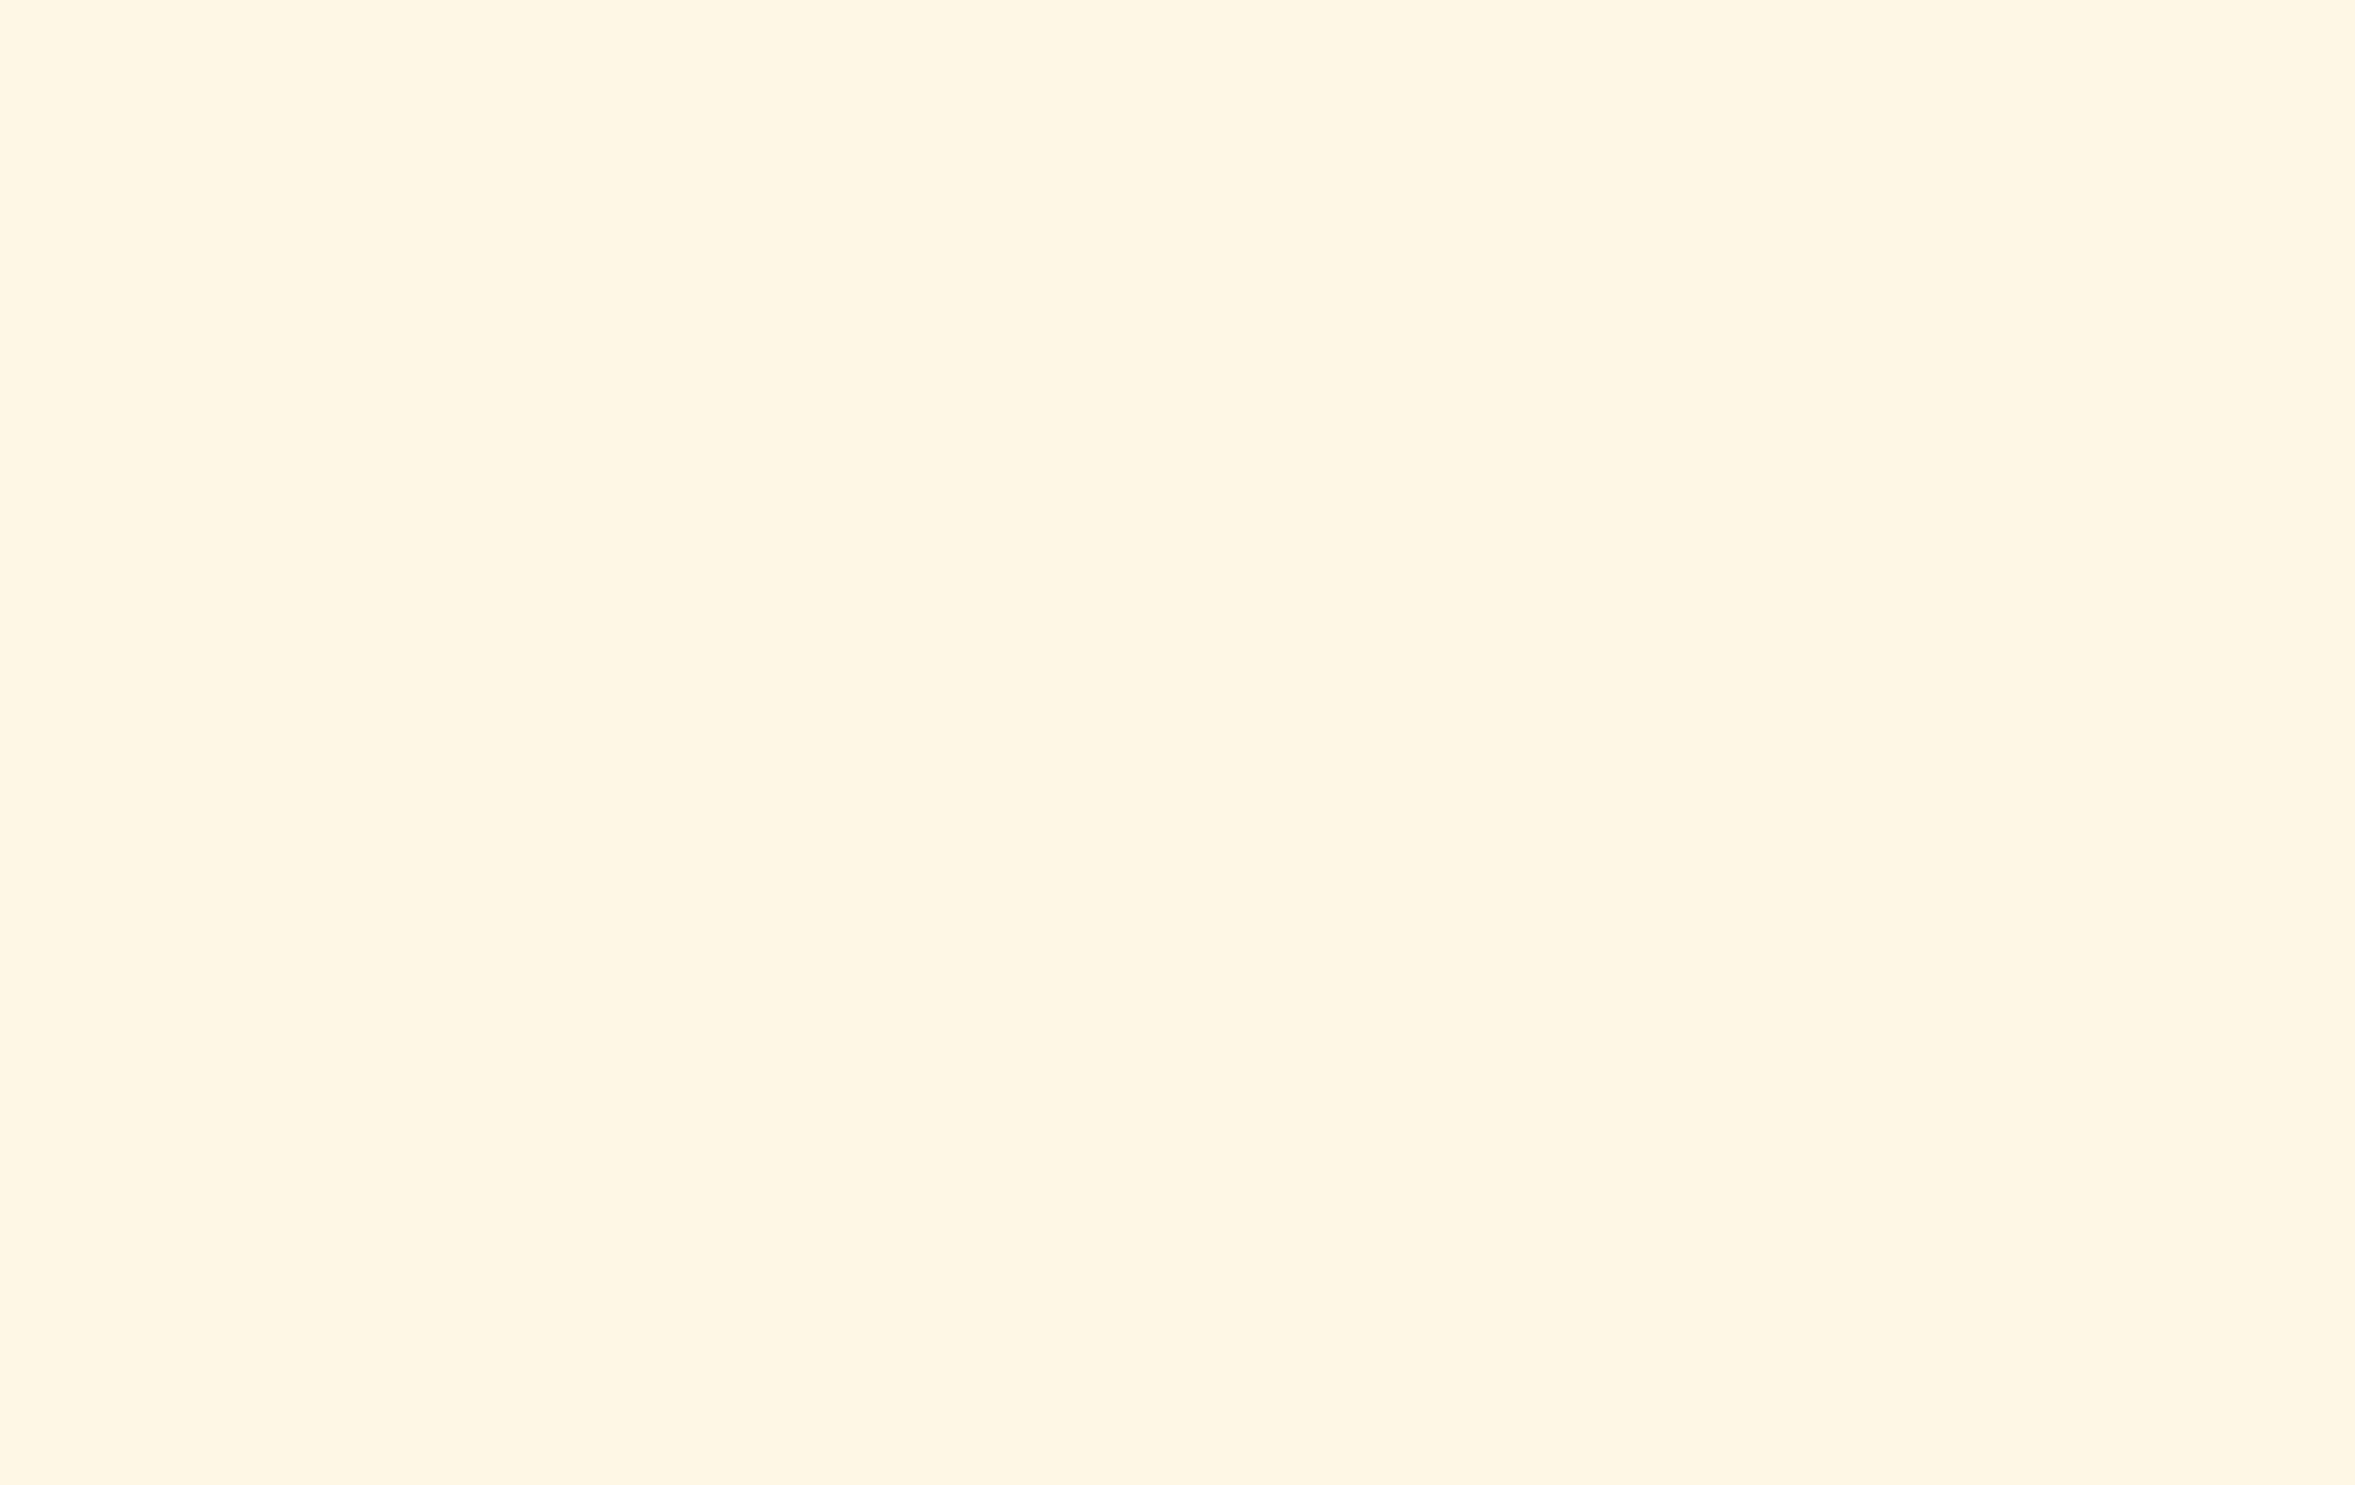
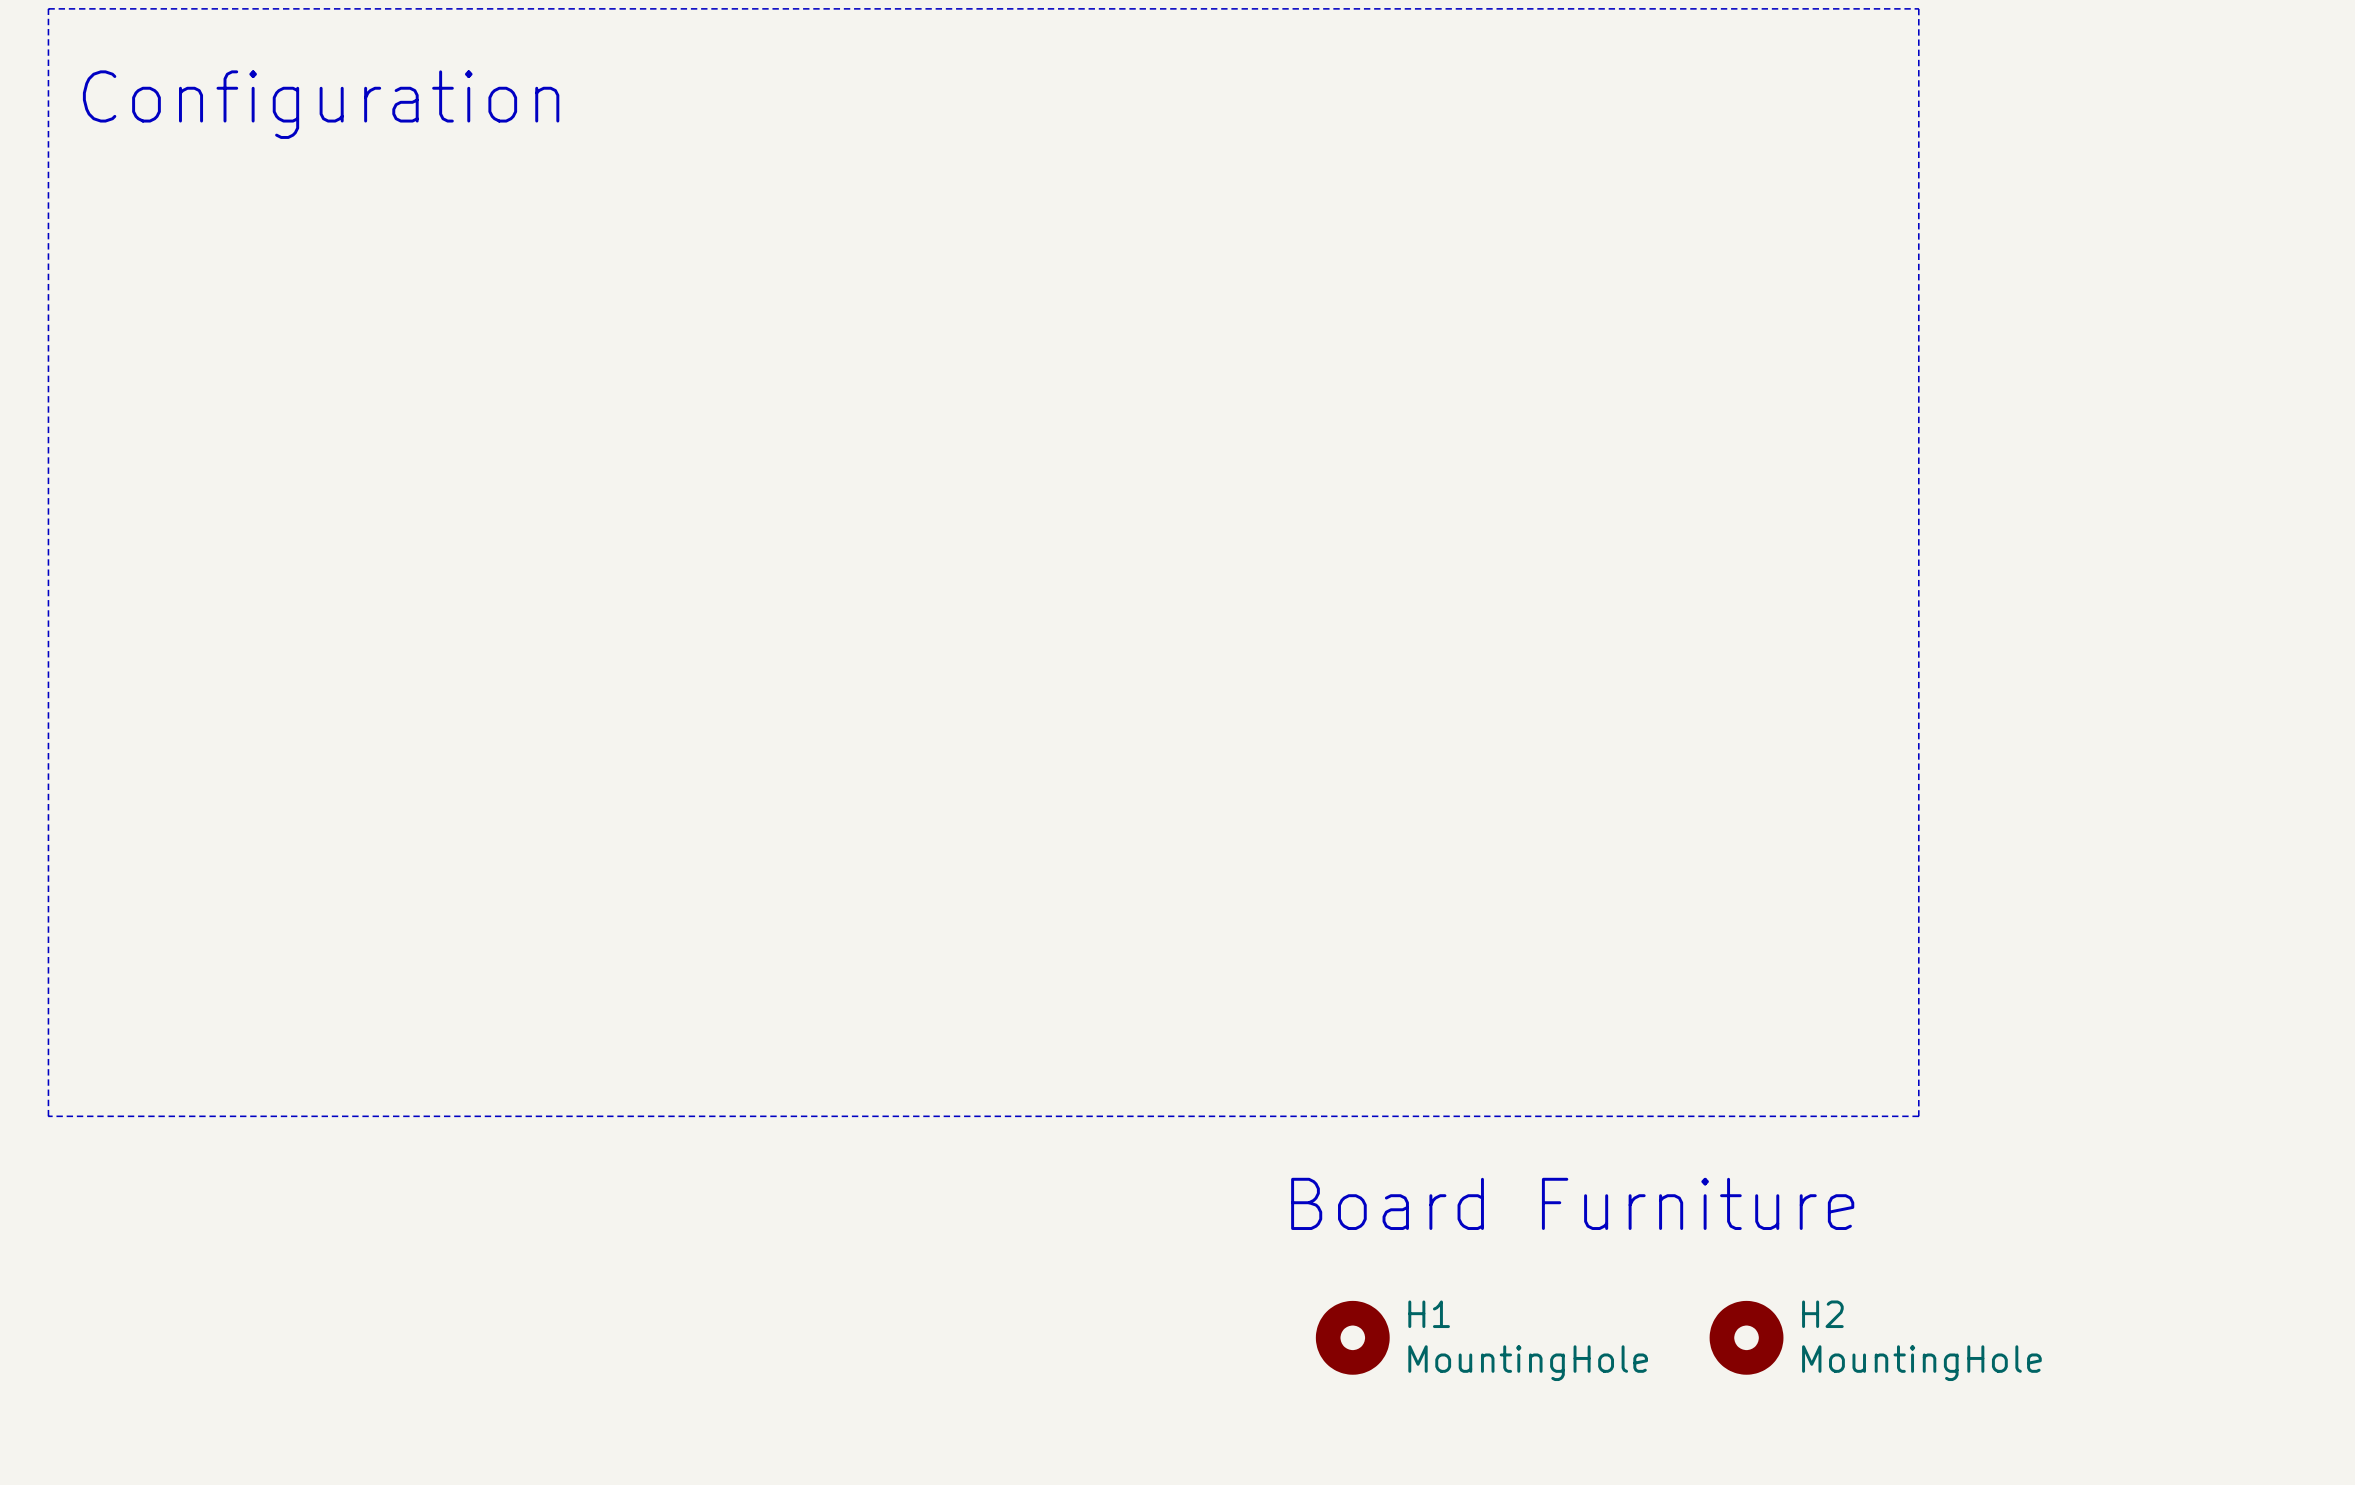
line: none -> (48, 8) (48, 1116) (1918, 1116) (1918, 8) (48, 8)
text: none -> Configuration (321, 104)
text: none -> Board Furniture (1572, 1203)
H1: none -> MountingHole (1352, 1337)
H2: none -> MountingHole (1746, 1337)

